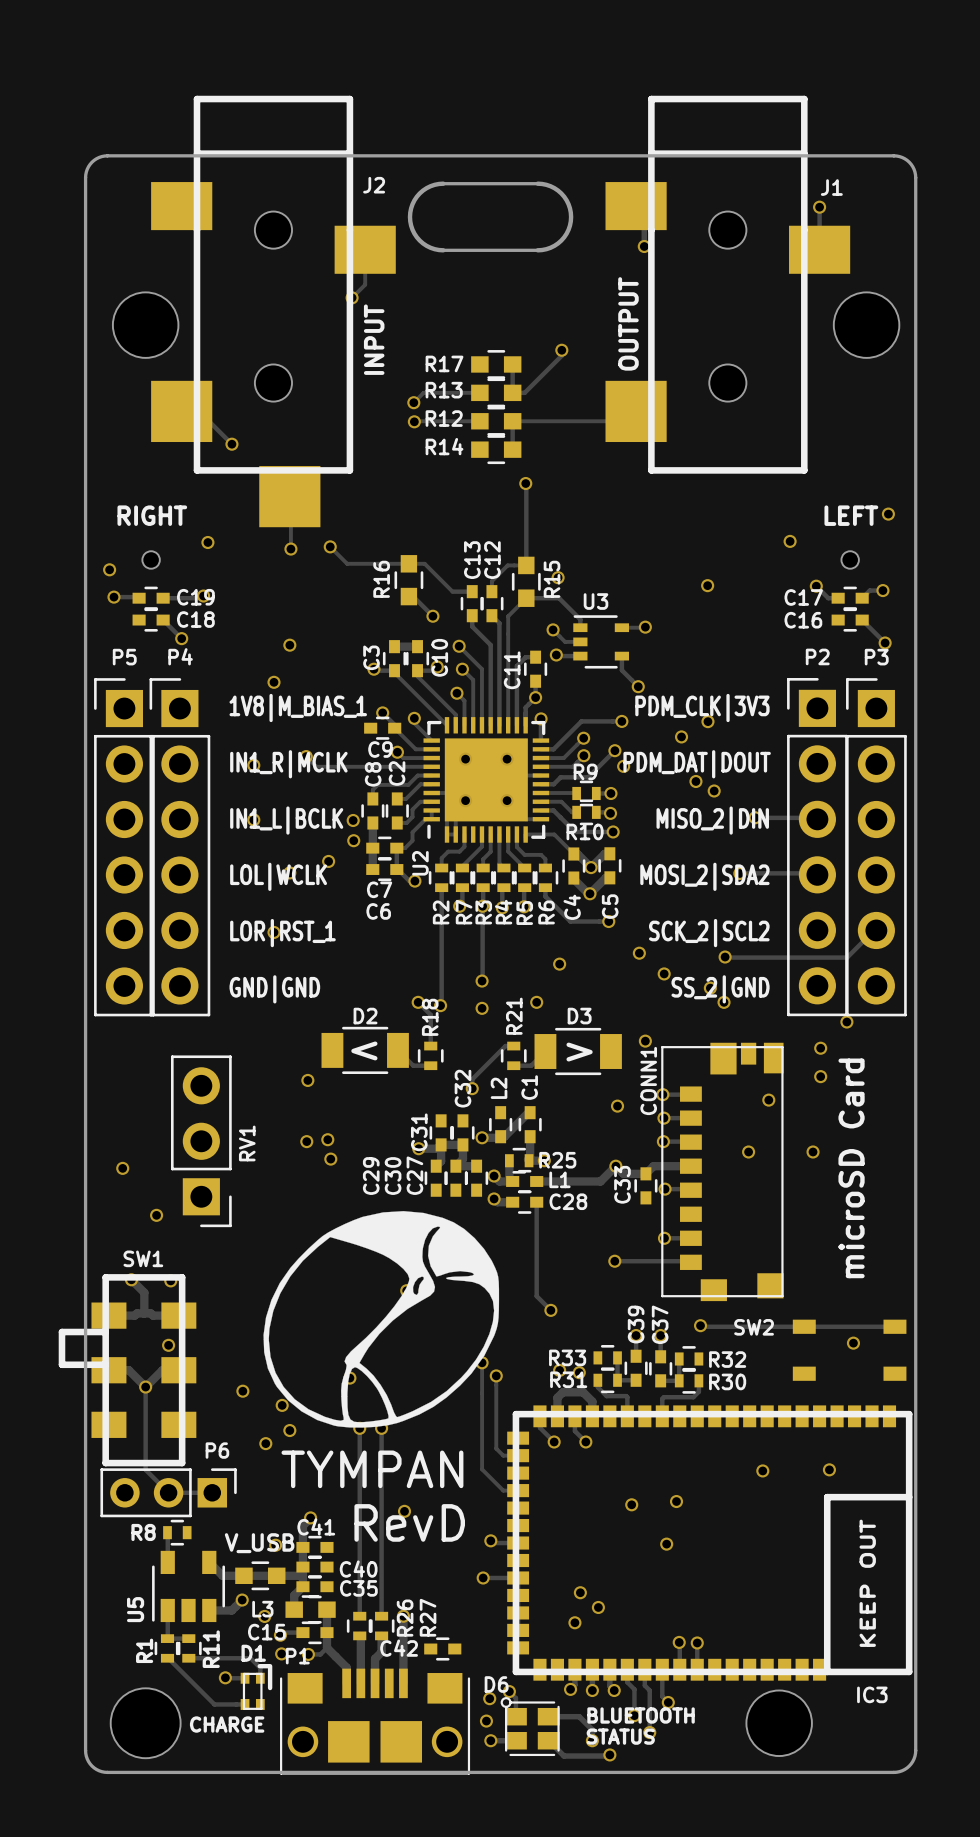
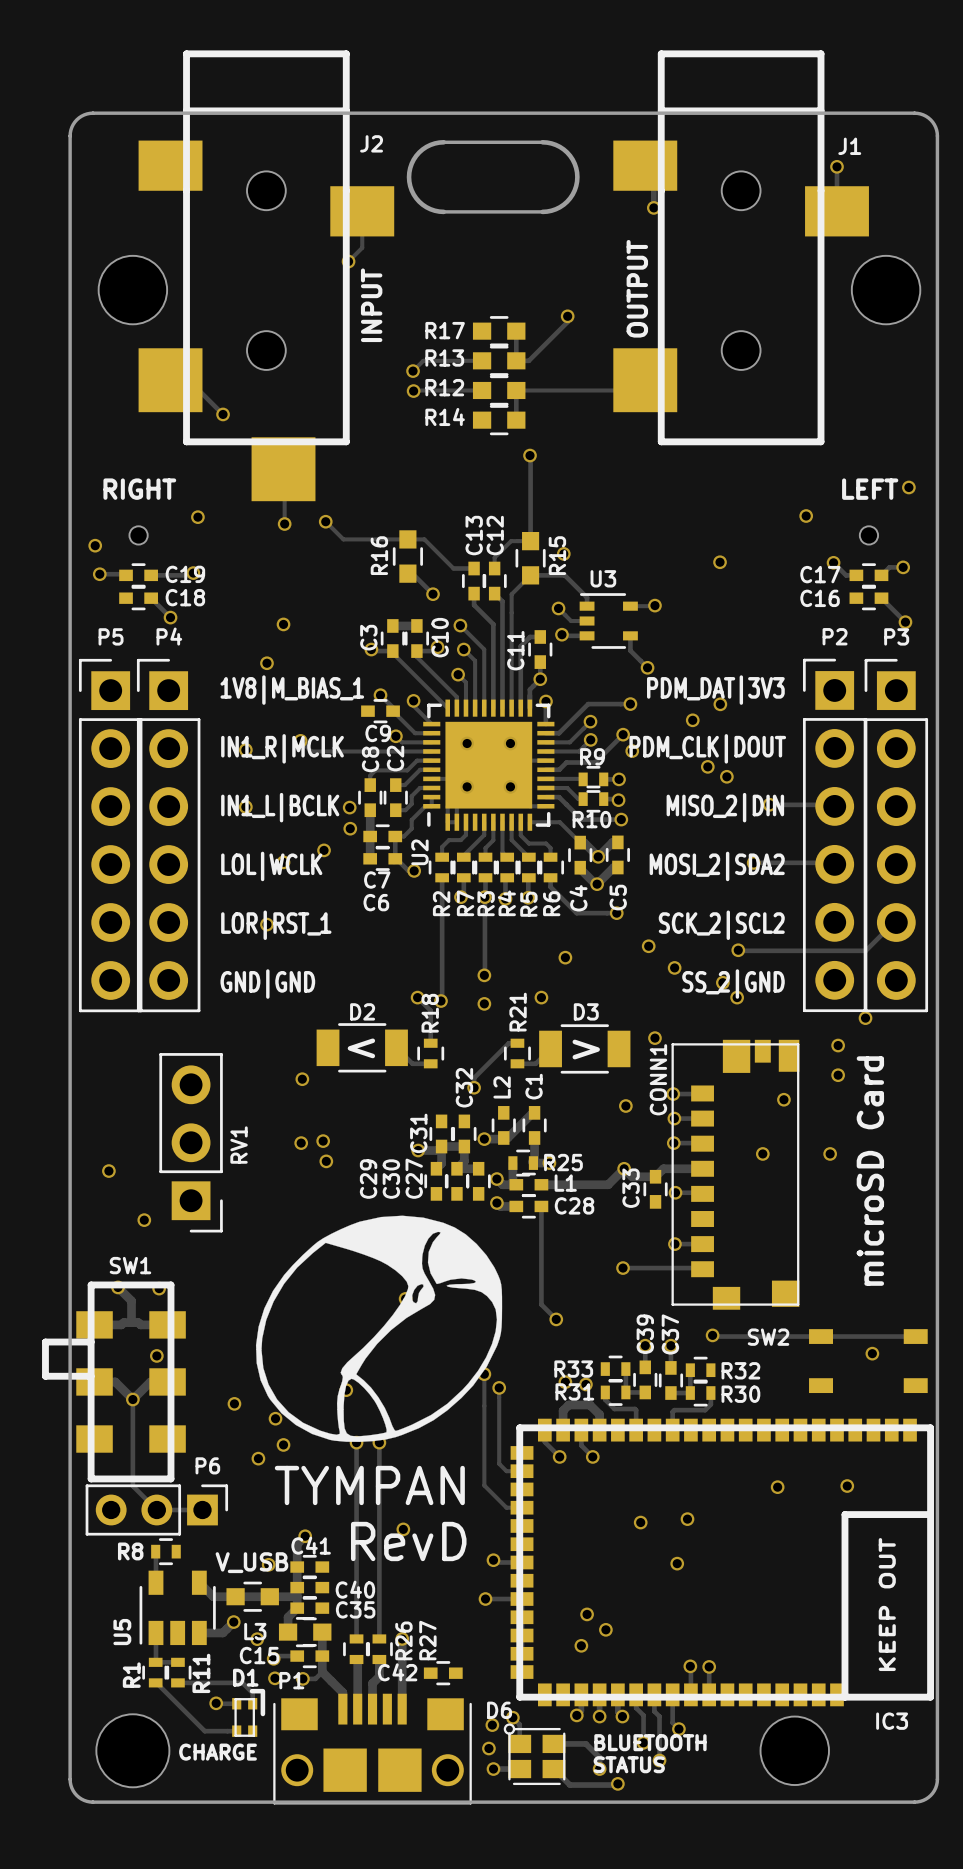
text: PDM_CLK|3V3 (702, 707) -> PDM_DAT|3V3 (715, 690)
text: PDM_DAT|DOUT (697, 764) -> PDM_CLK|DOUT (707, 748)

